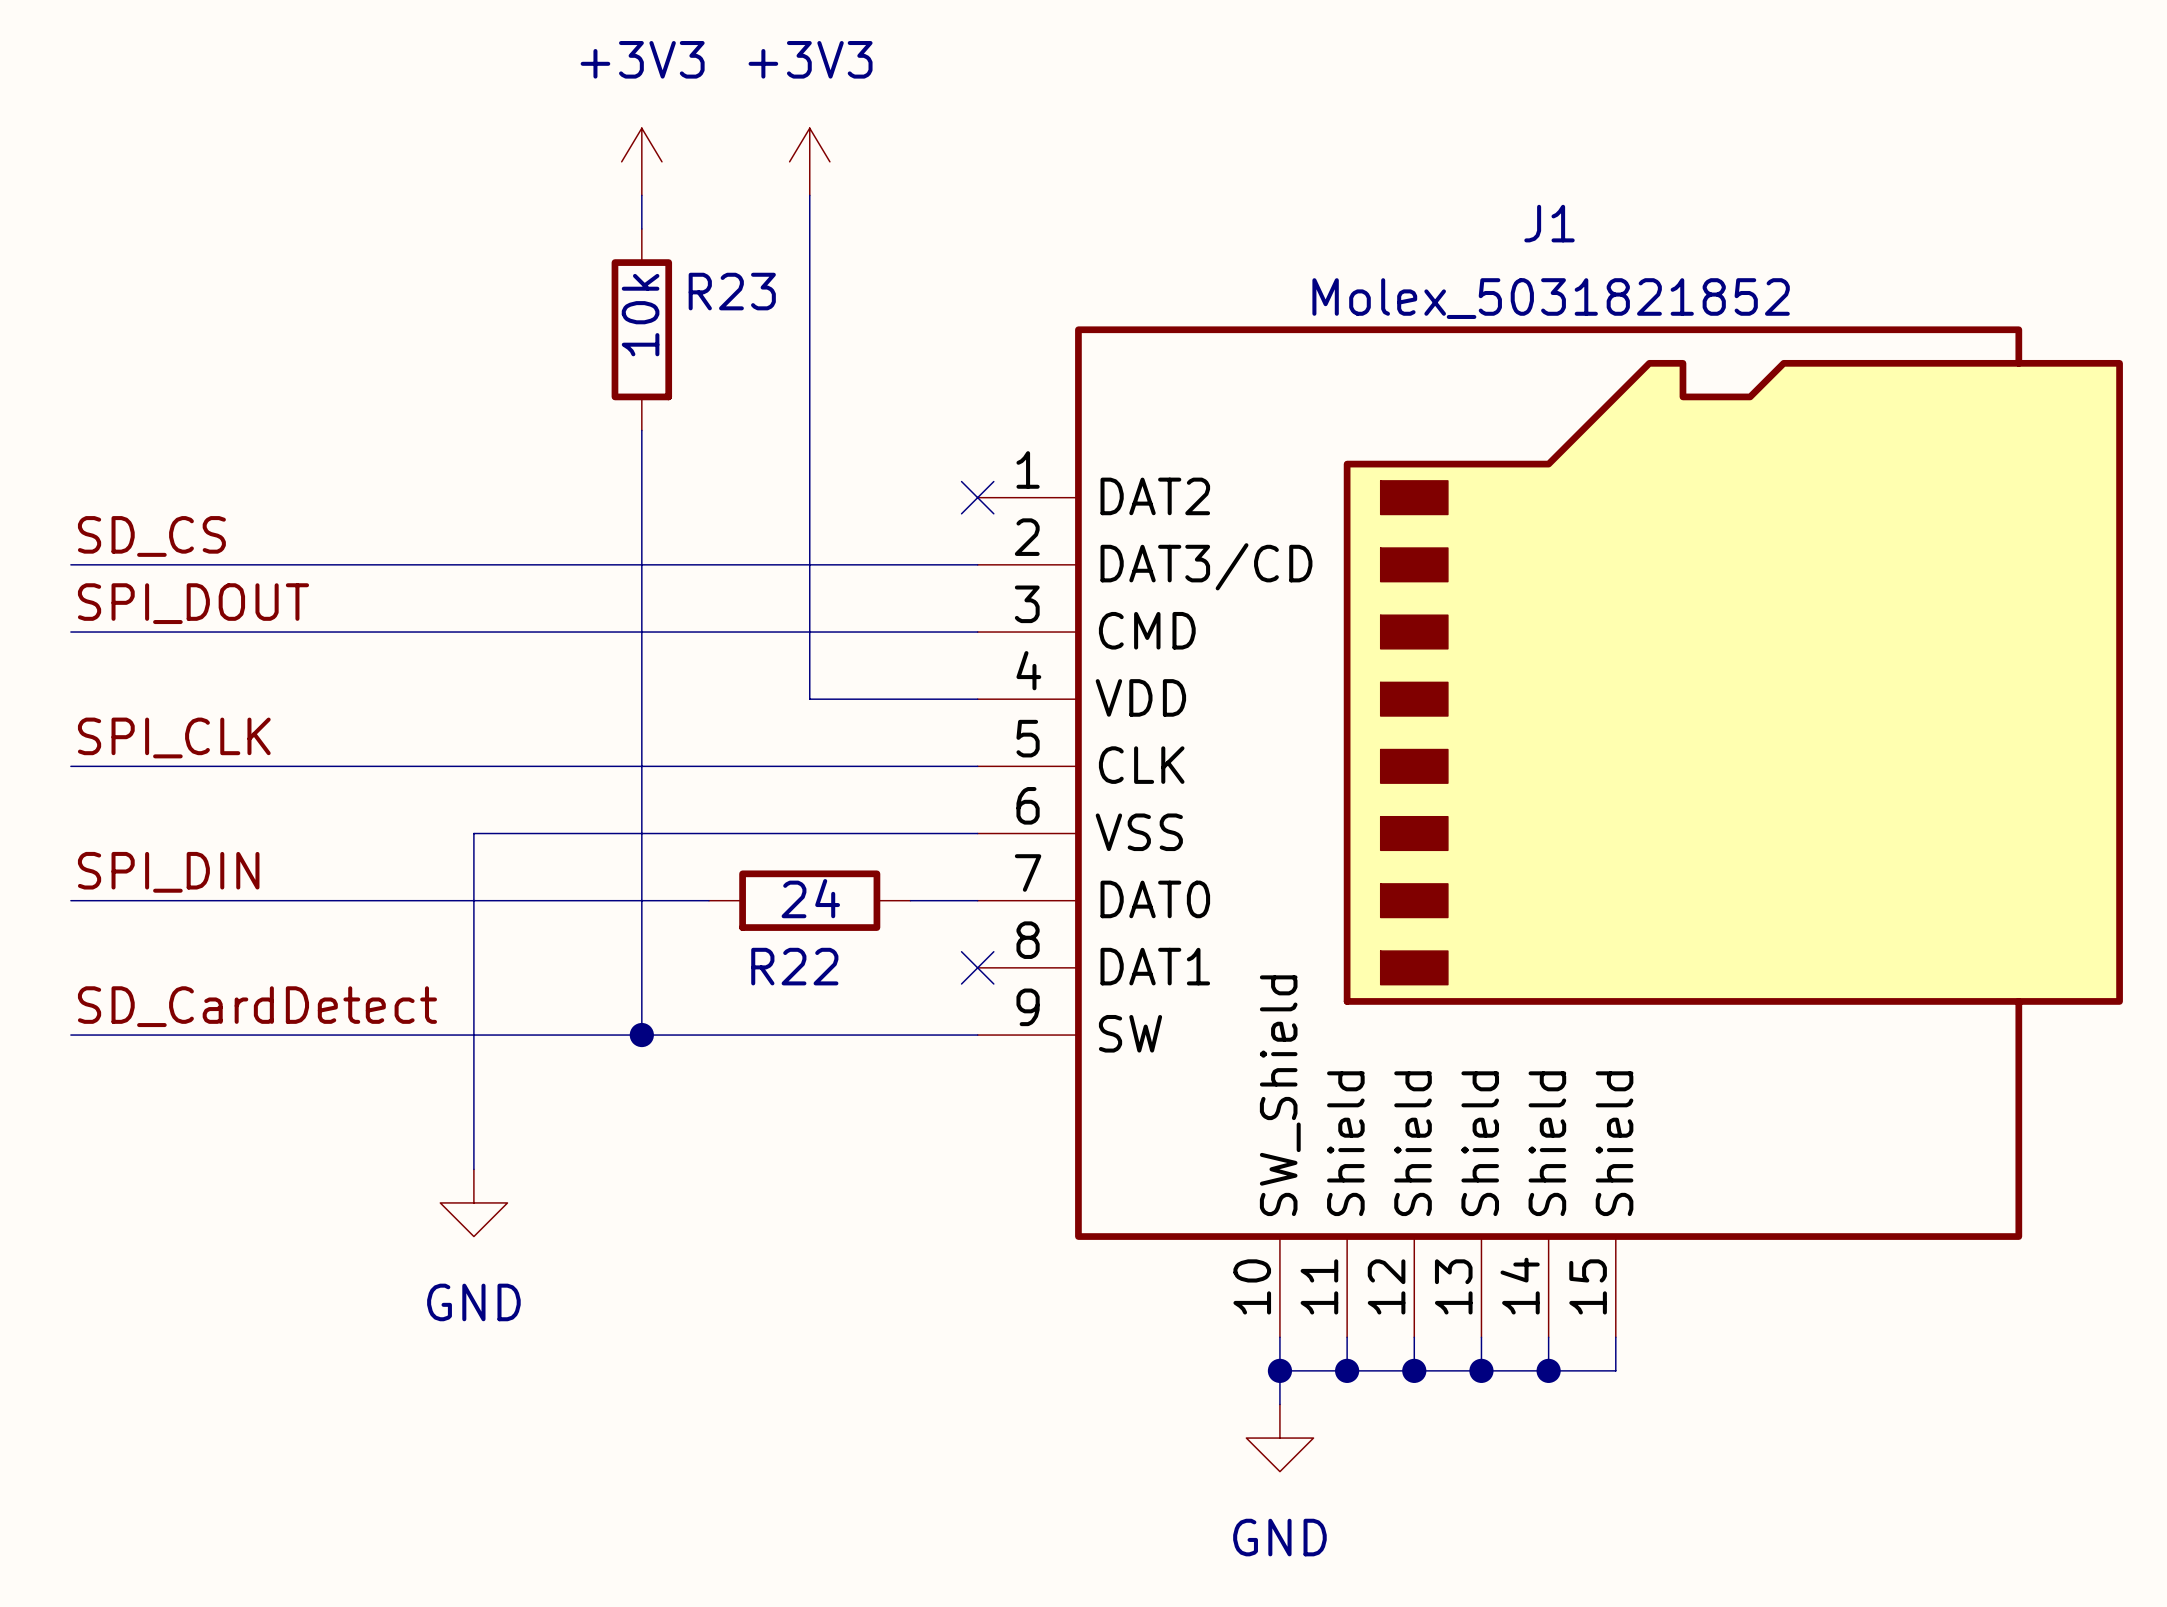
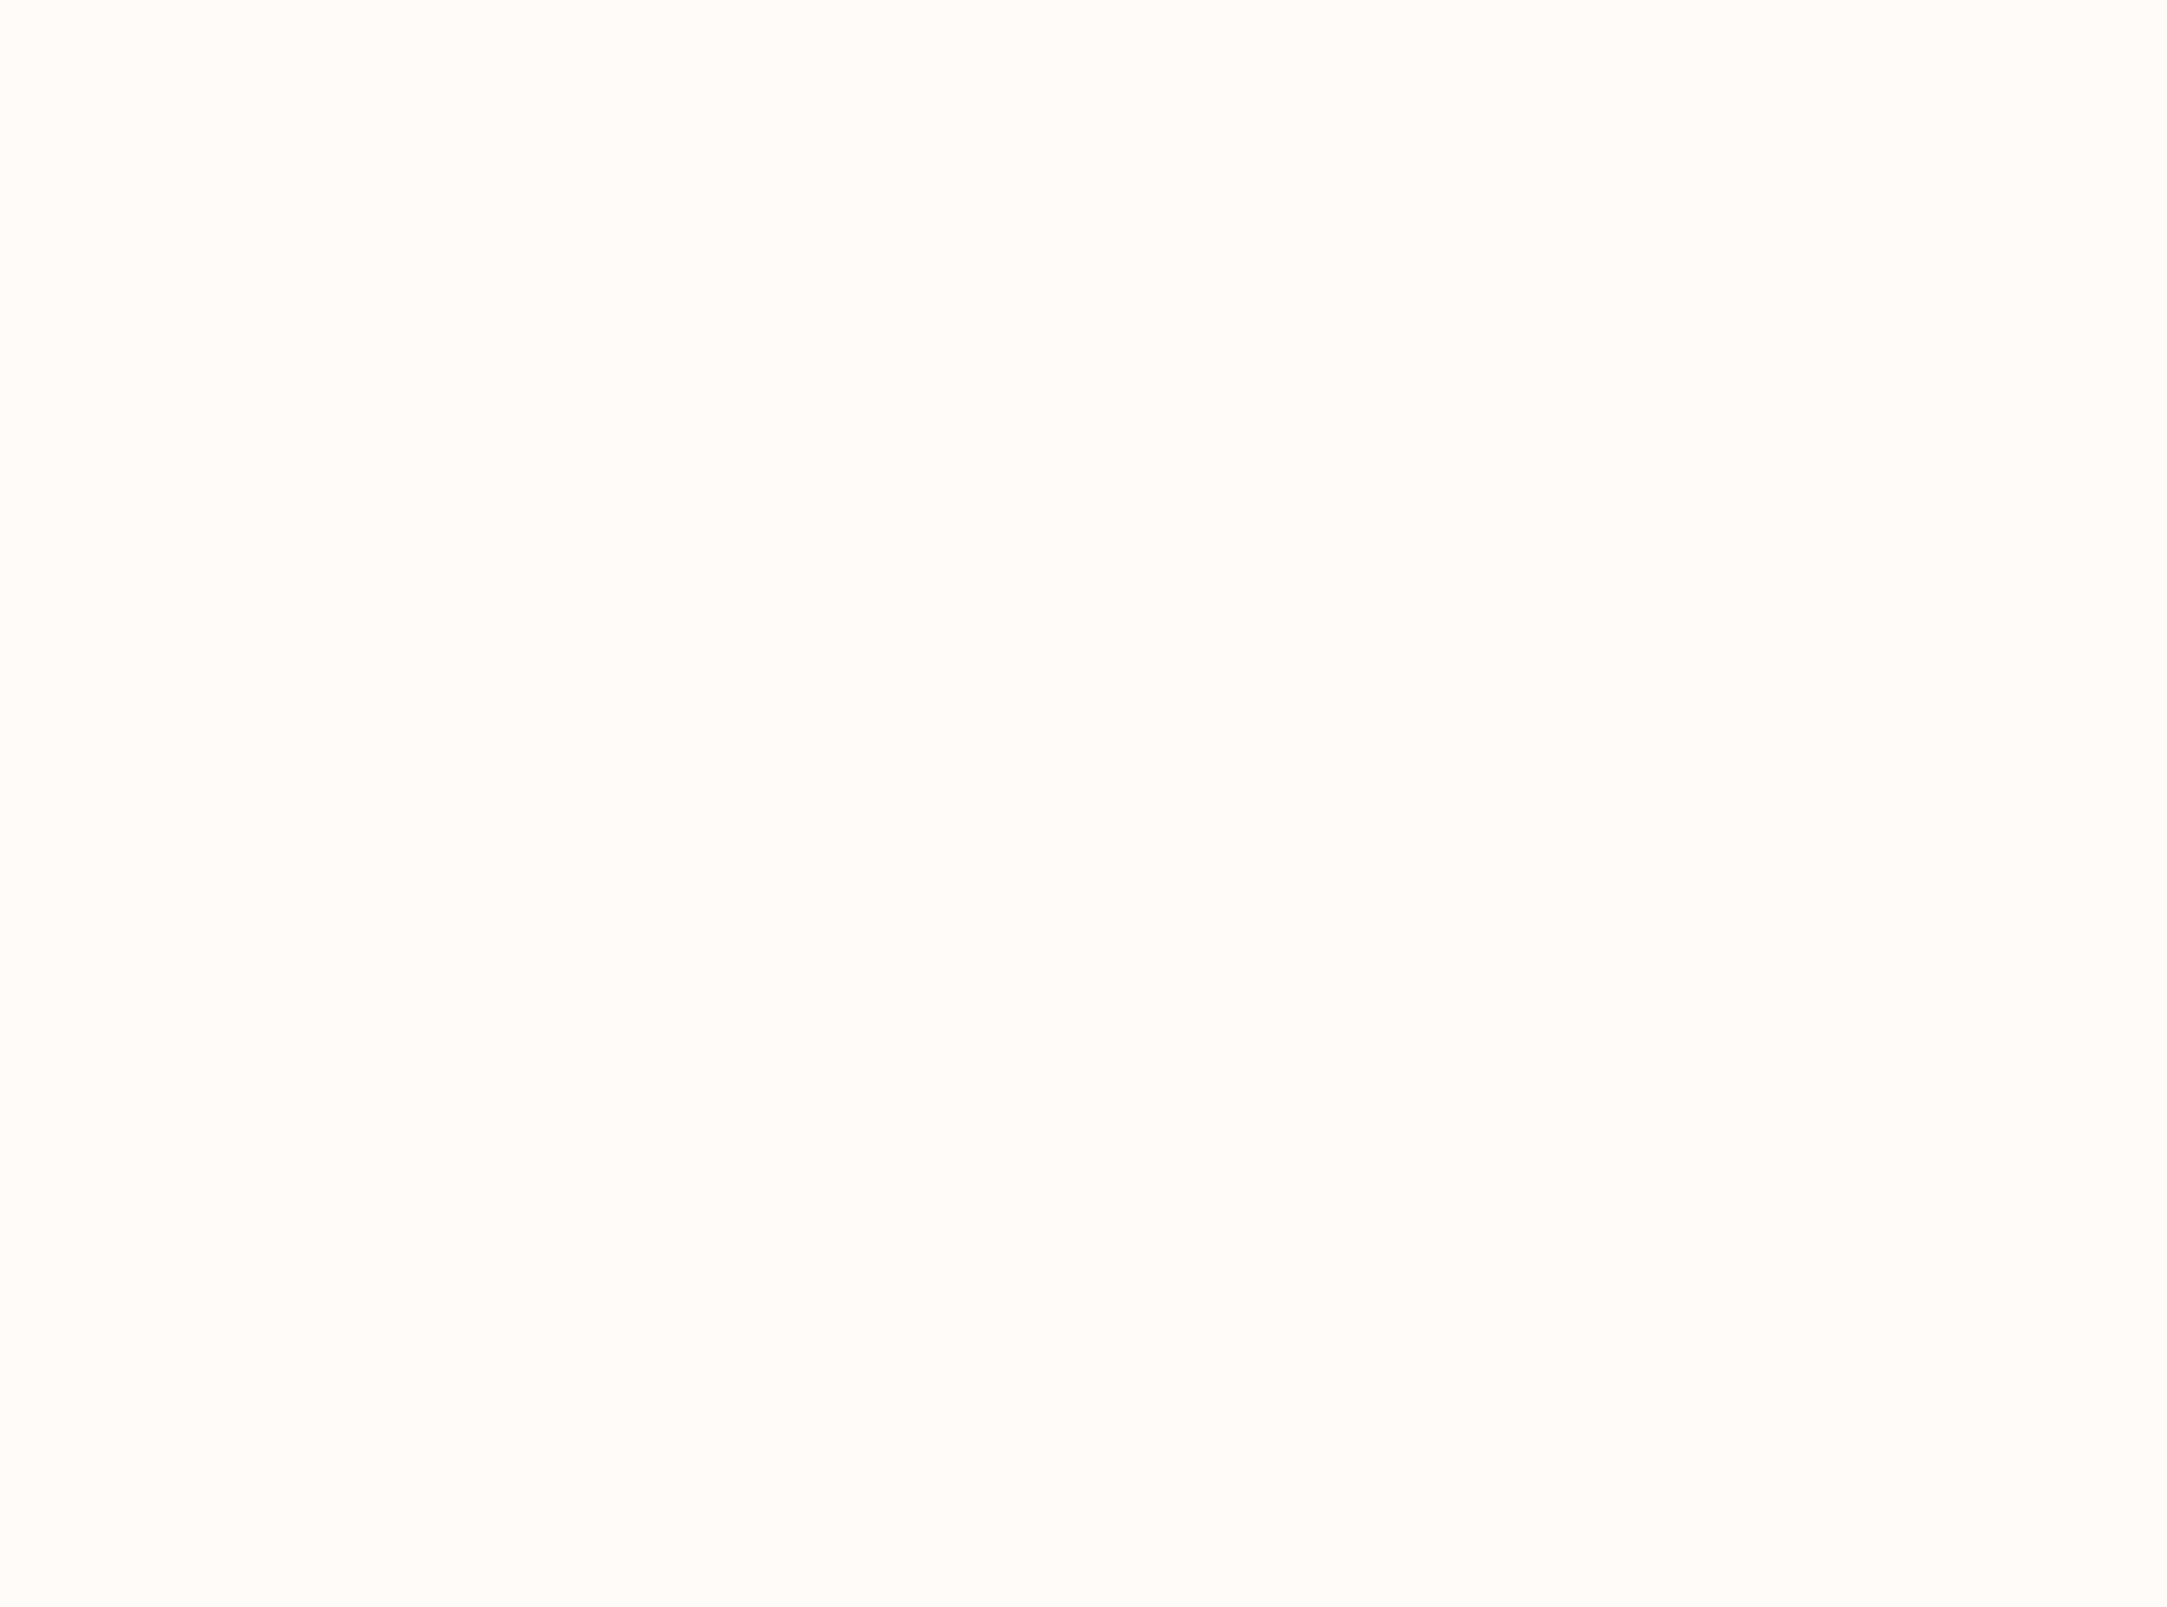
power symbol: +3V3 (641, 161) -> none
power symbol: +3V3 (809, 161) -> none
wire: (641, 195) (641, 228) -> none
wire: (809, 195) (809, 699) (977, 699) -> none
R23: 10k (641, 329) -> none
wire: (641, 430) (641, 1035) -> none
no-connect mark: (977, 497) -> none
label: SD_CS (151, 536) -> none
wire: (70, 564) (977, 564) -> none
label: SPI_DOUT (193, 603) -> none
wire: (70, 632) (977, 632) -> none
label: SPI_CLK (174, 737) -> none
wire: (70, 766) (977, 766) -> none
J1: Molex_5031821852 (1550, 831) -> none
wire: (977, 833) (473, 833) (473, 1169) -> none
label: SPI_DIN (168, 872) -> none
wire: (70, 900) (709, 900) -> none
R22: 24 (809, 900) -> none
wire: (910, 900) (977, 900) -> none
no-connect mark: (977, 967) -> none
label: SD_CardDetect (257, 1006) -> none
wire: (70, 1035) (977, 1035) -> none
junction: (641, 1035) -> none
power symbol: GND (473, 1202) -> none
wire: (1279, 1337) (1279, 1404) -> none
wire: (1347, 1337) (1347, 1370) -> none
wire: (1414, 1337) (1414, 1370) -> none
wire: (1481, 1337) (1481, 1370) -> none
wire: (1548, 1337) (1548, 1370) -> none
wire: (1615, 1337) (1615, 1370) (1279, 1370) -> none
junction: (1279, 1370) -> none
junction: (1347, 1370) -> none
junction: (1414, 1370) -> none
junction: (1481, 1370) -> none
junction: (1548, 1370) -> none
power symbol: GND (1279, 1438) -> none

